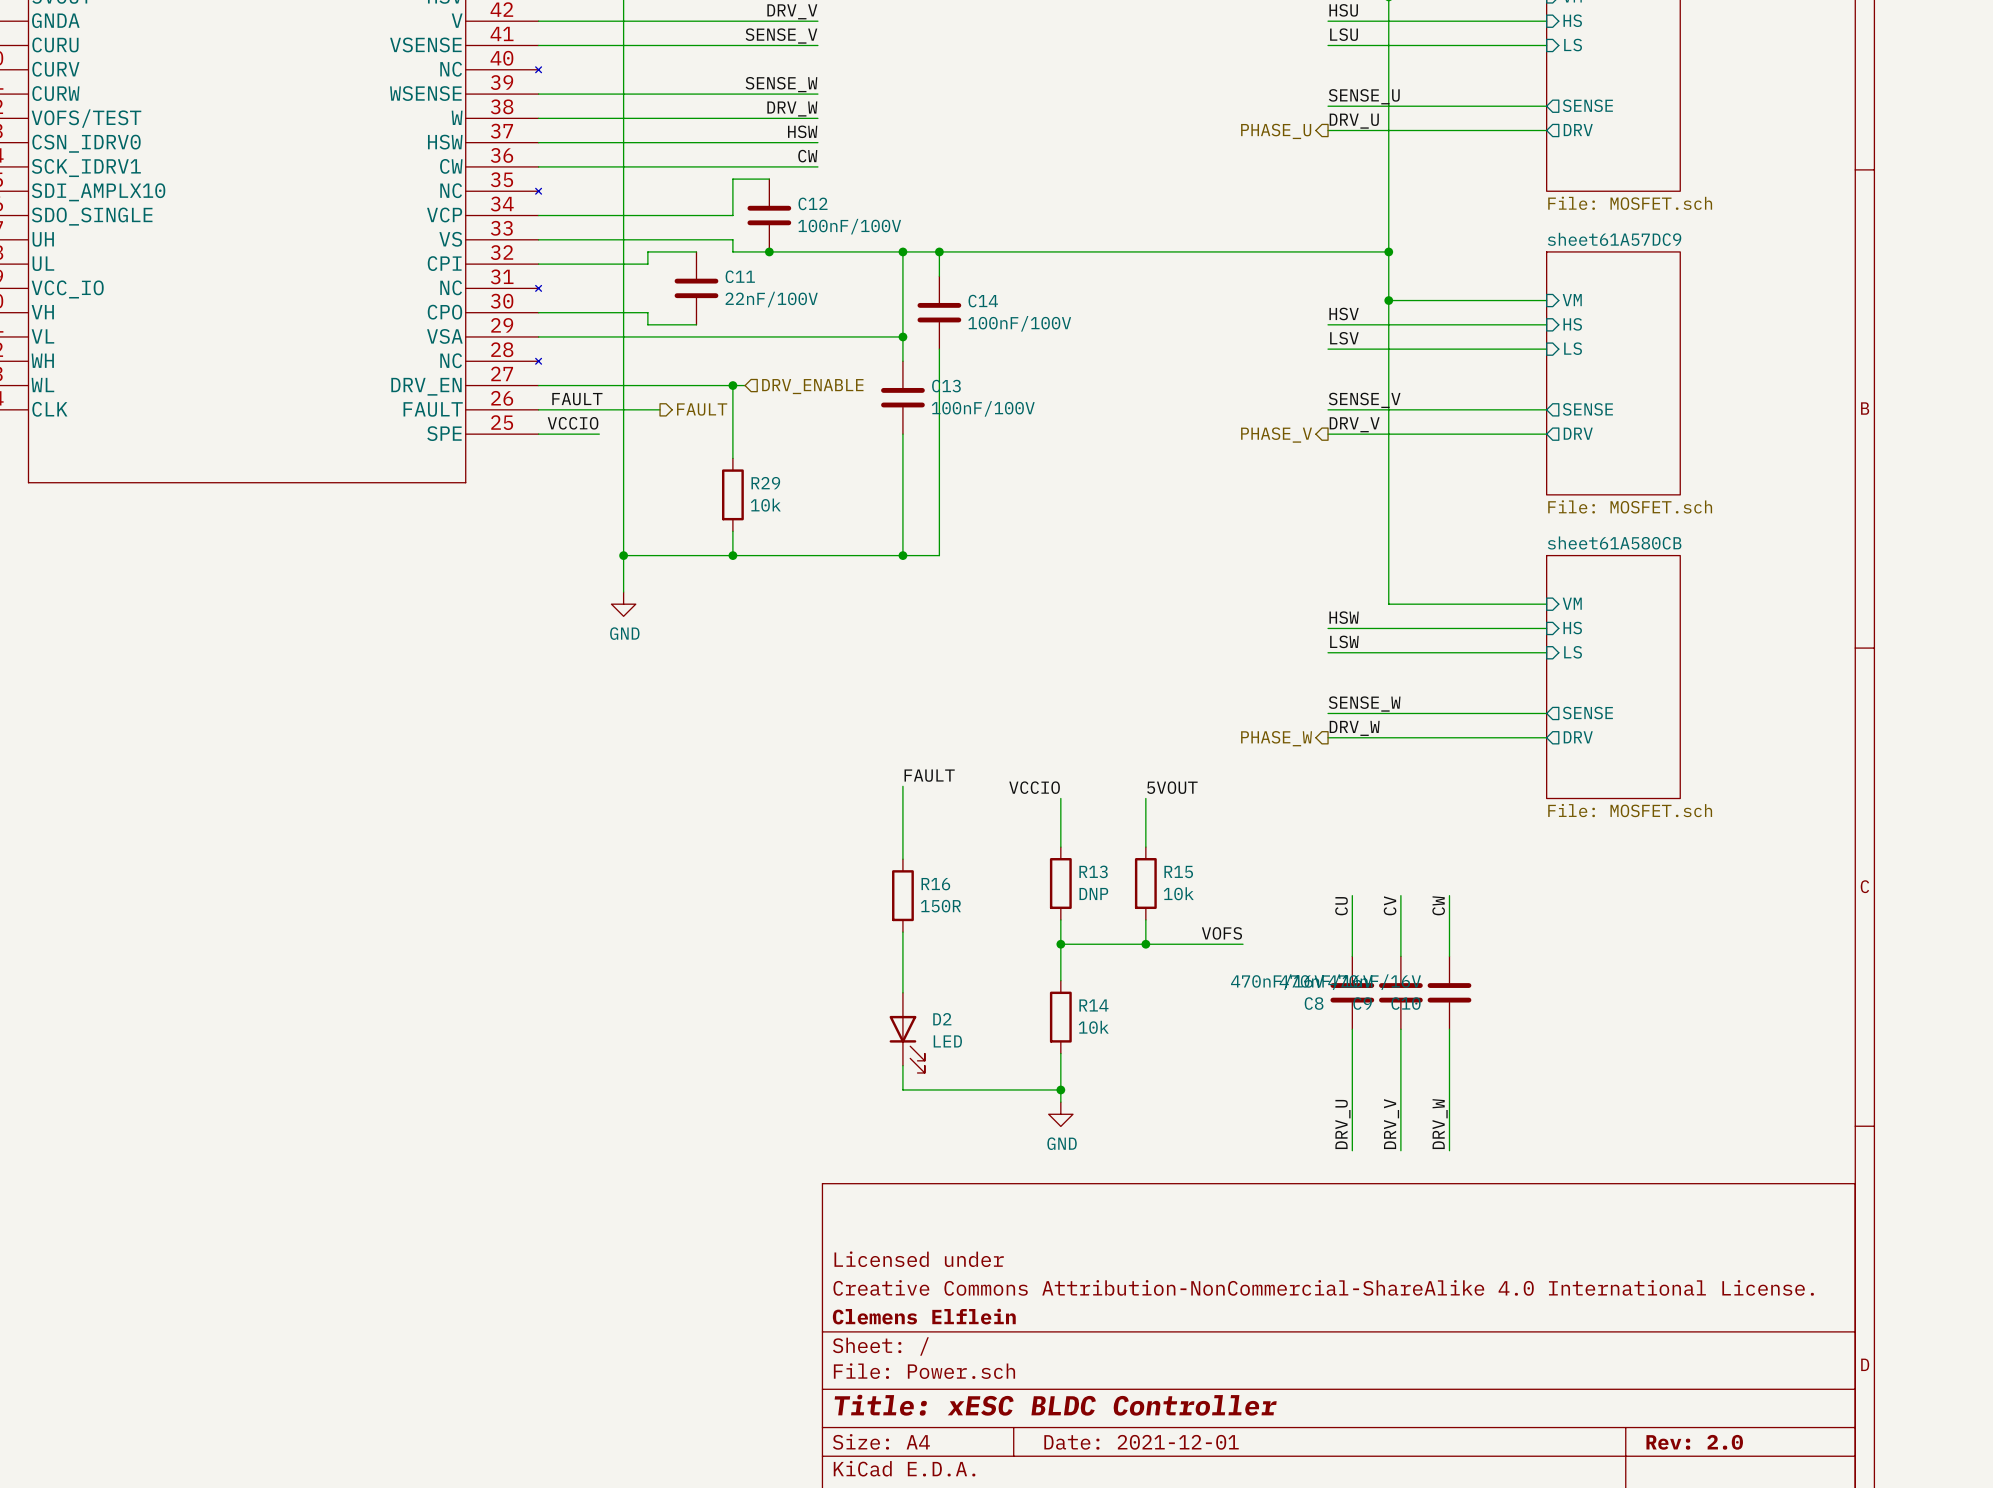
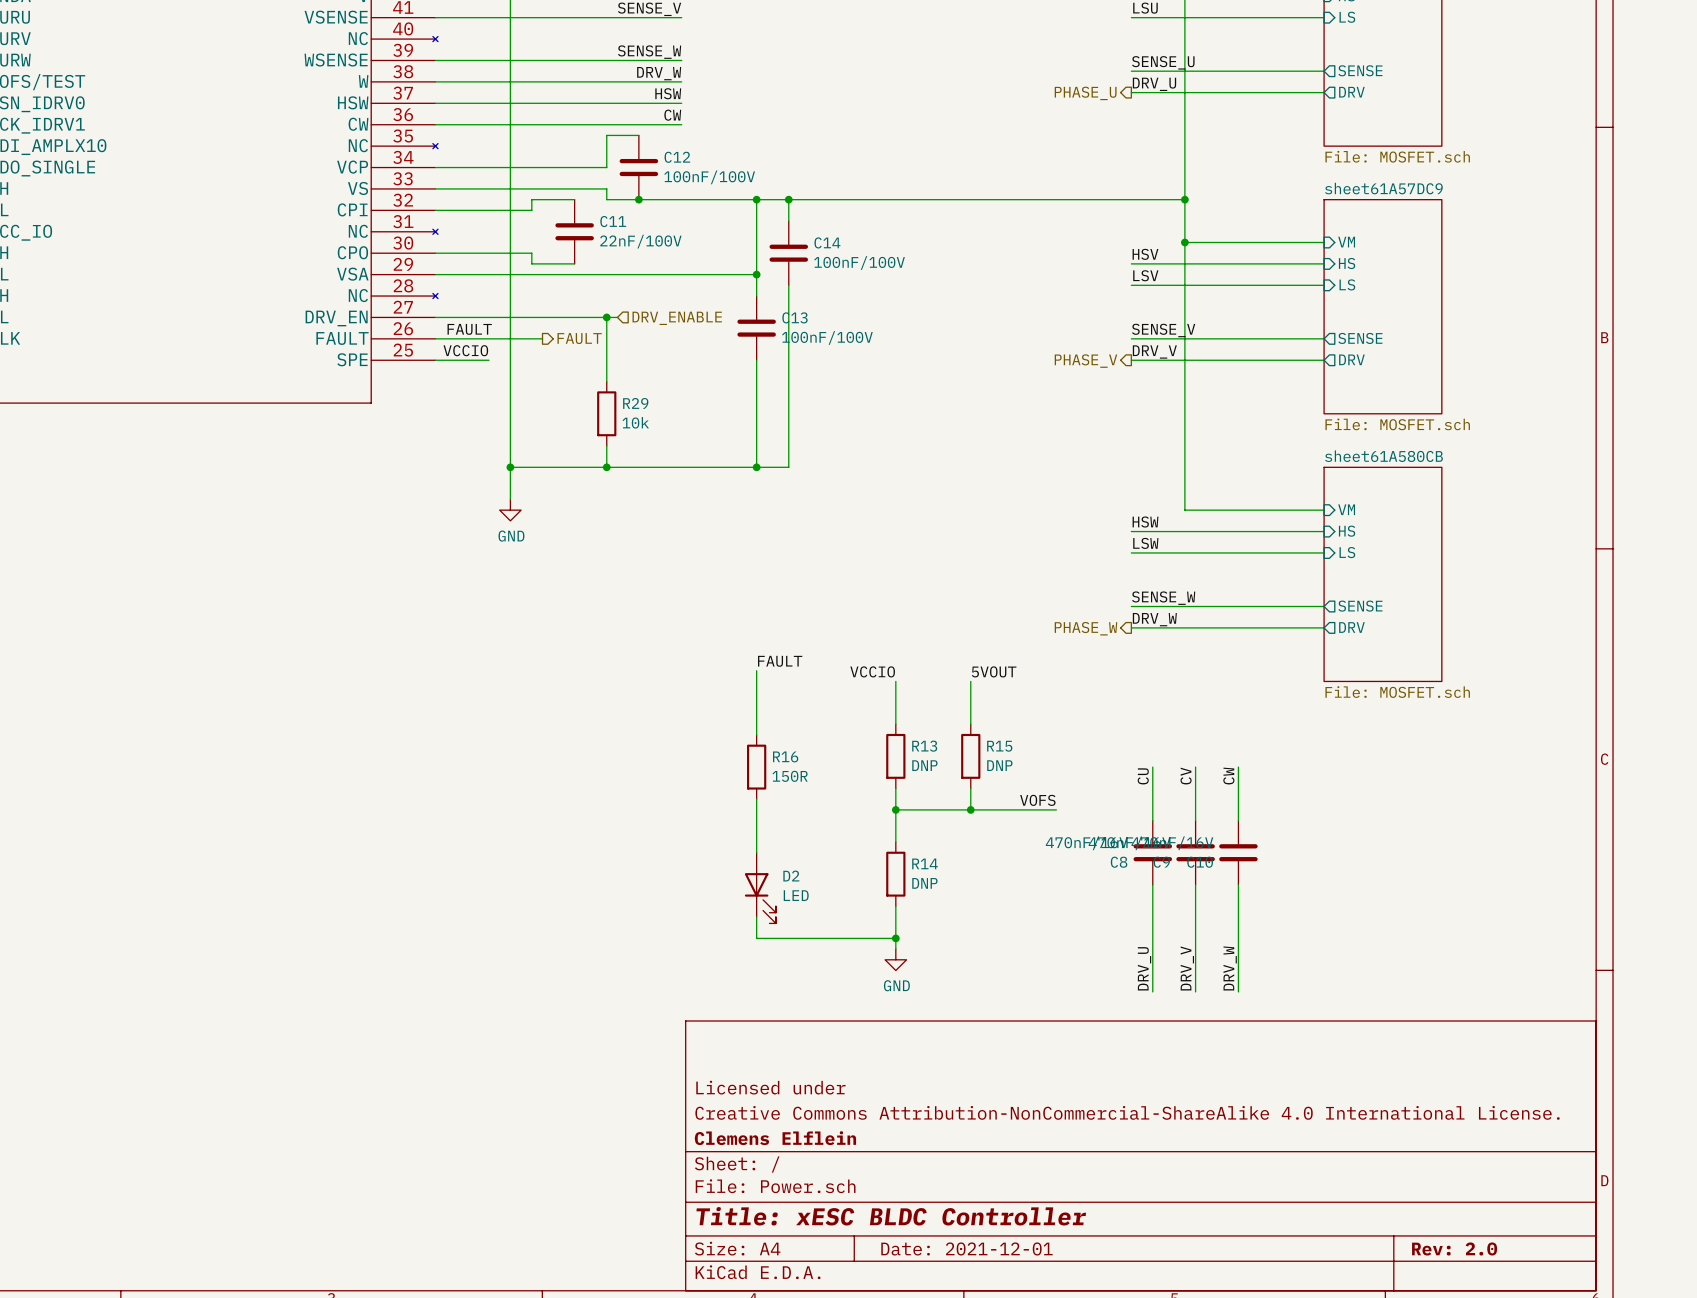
R15 value: 10k (1178, 893) -> DNP (999, 765)
R14 value: 10k (1093, 1027) -> DNP (924, 883)

